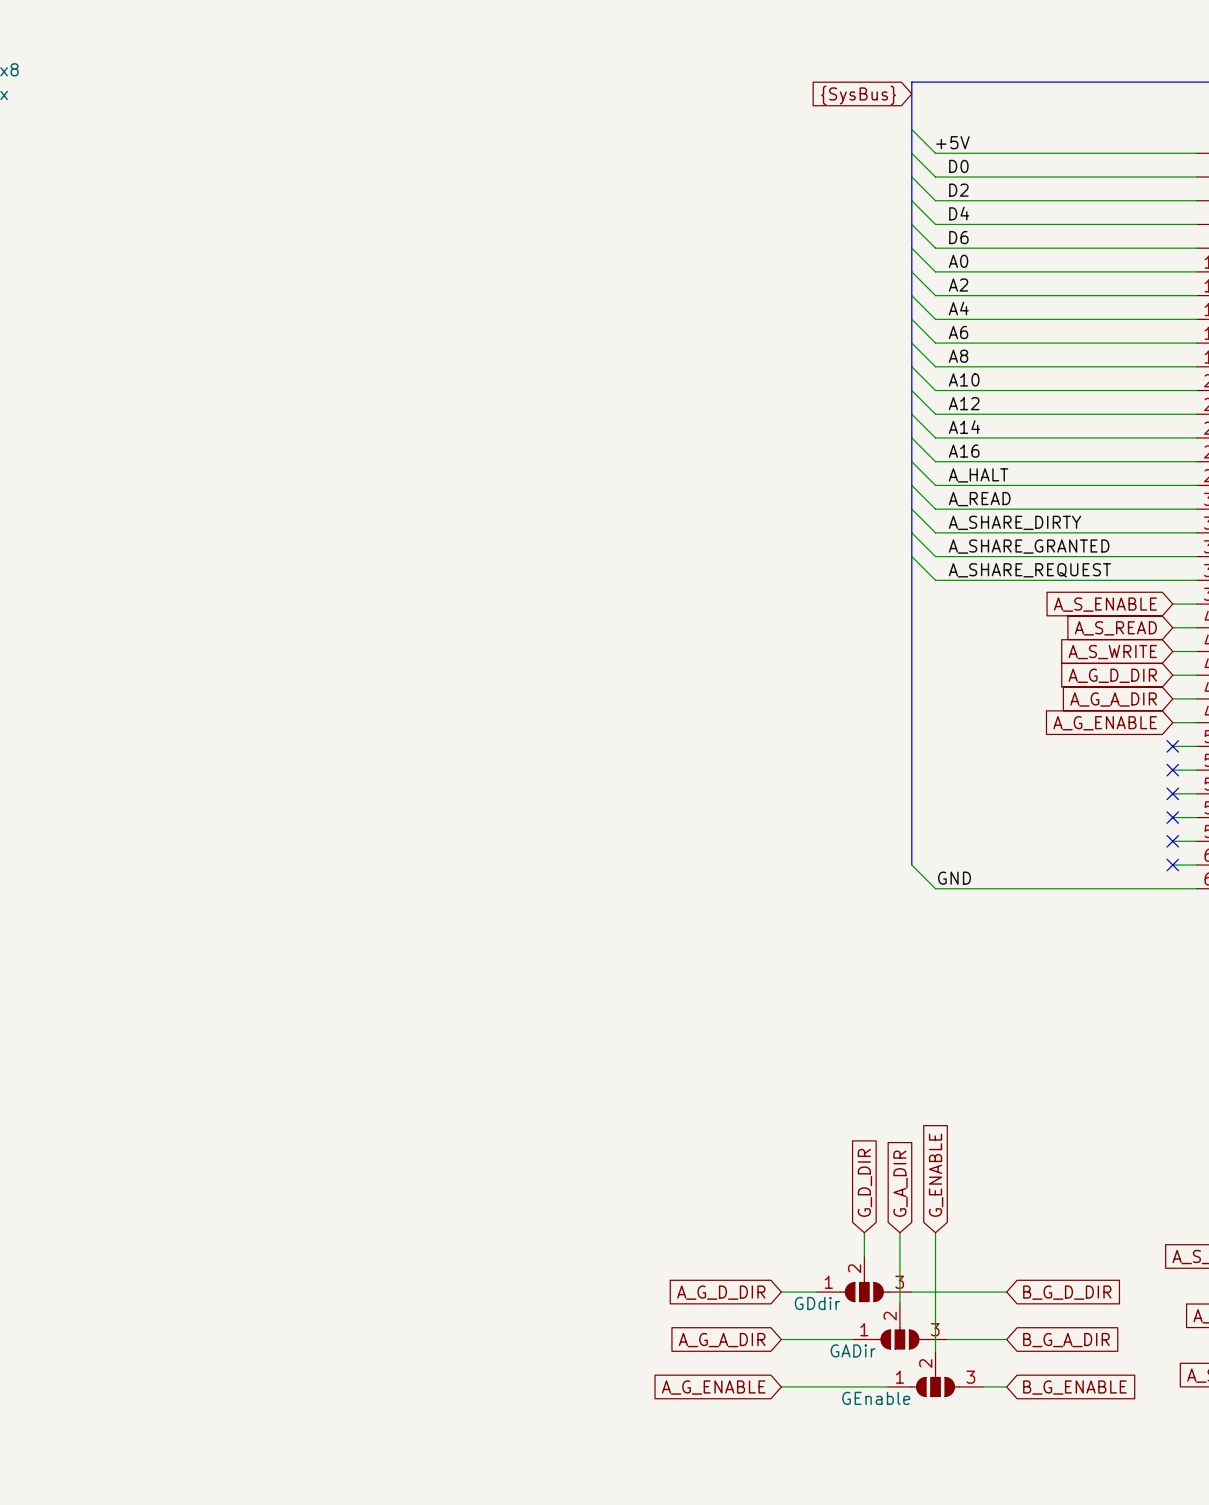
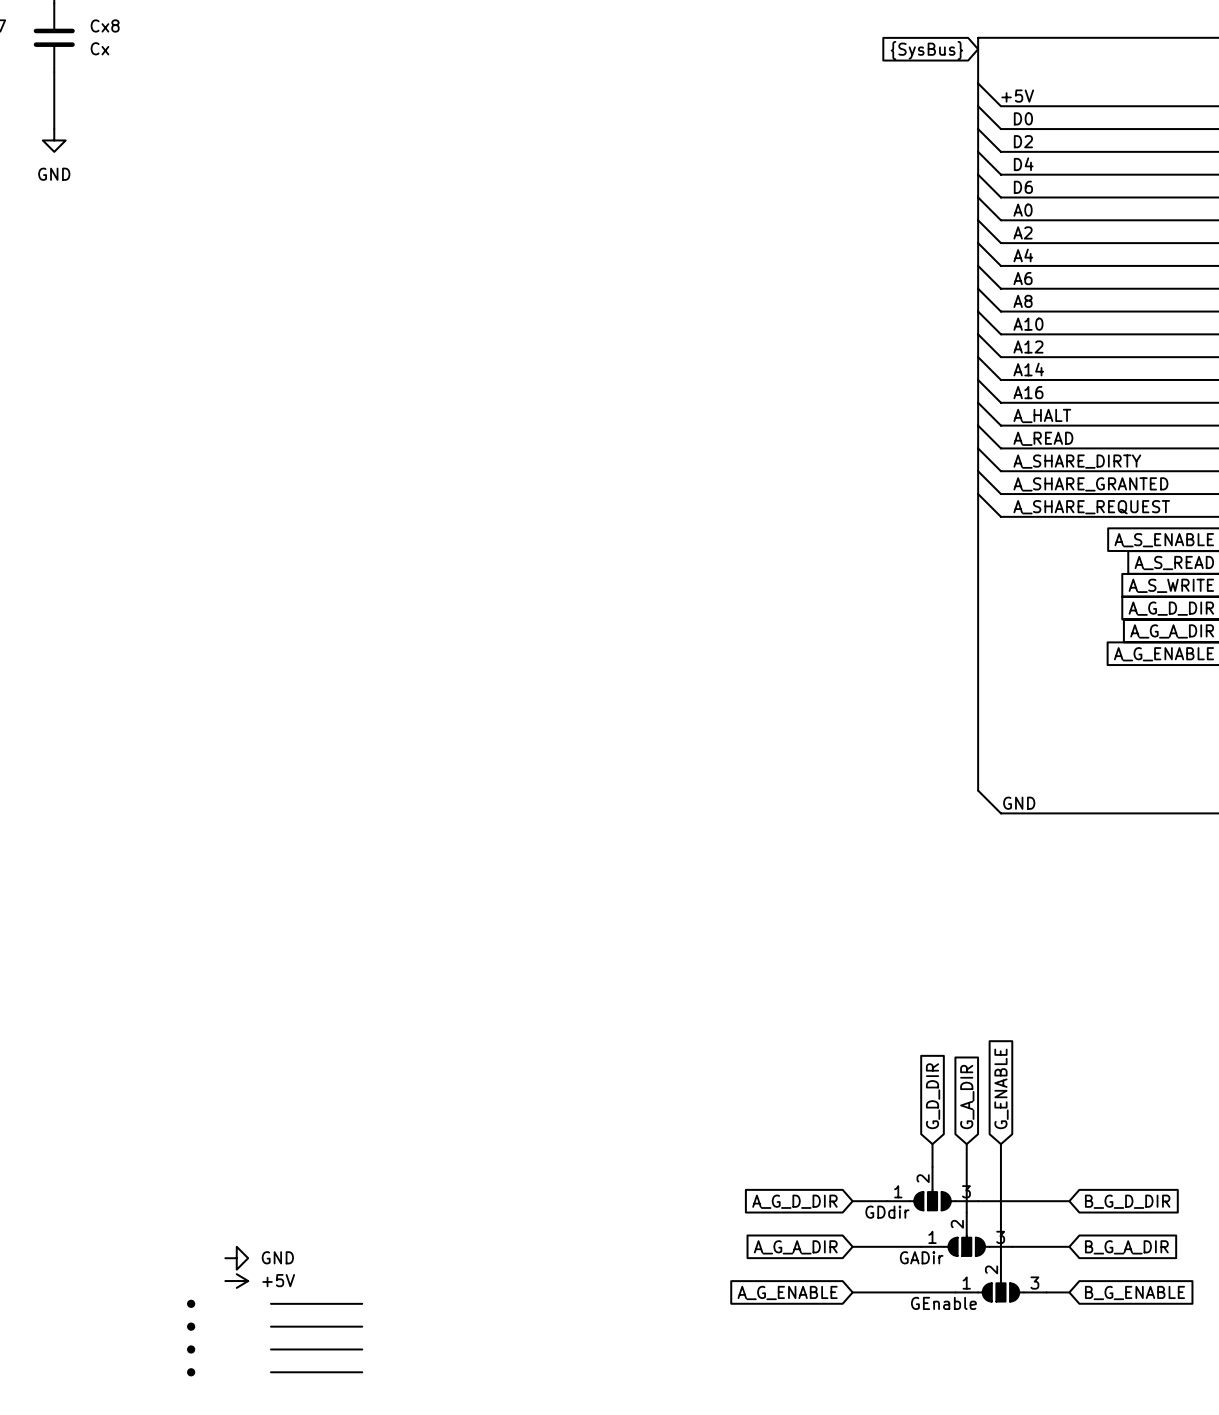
power symbol: none -> GND (236, 1258)
power symbol: none -> +5V (236, 1281)
junction: none -> (191, 1303)
wire: none -> (270, 1303) (362, 1303)
junction: none -> (191, 1326)
wire: none -> (270, 1326) (362, 1326)
junction: none -> (191, 1349)
wire: none -> (270, 1349) (362, 1349)
junction: none -> (191, 1372)
wire: none -> (270, 1372) (362, 1372)

